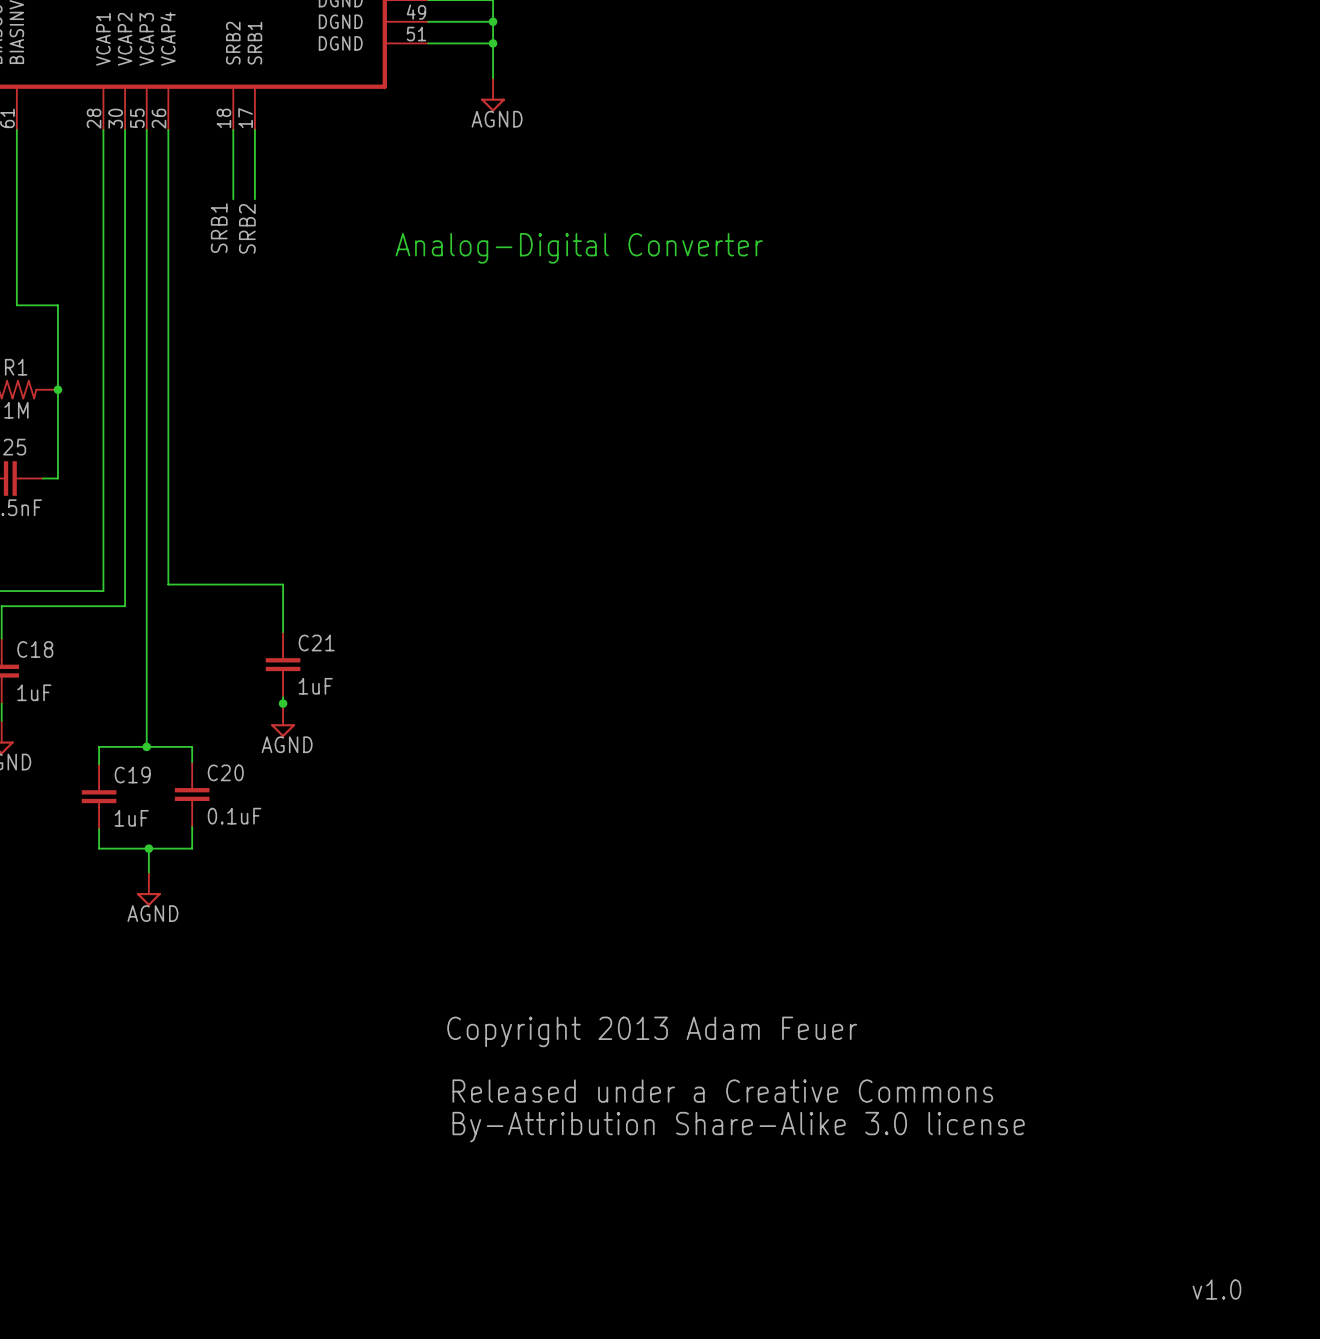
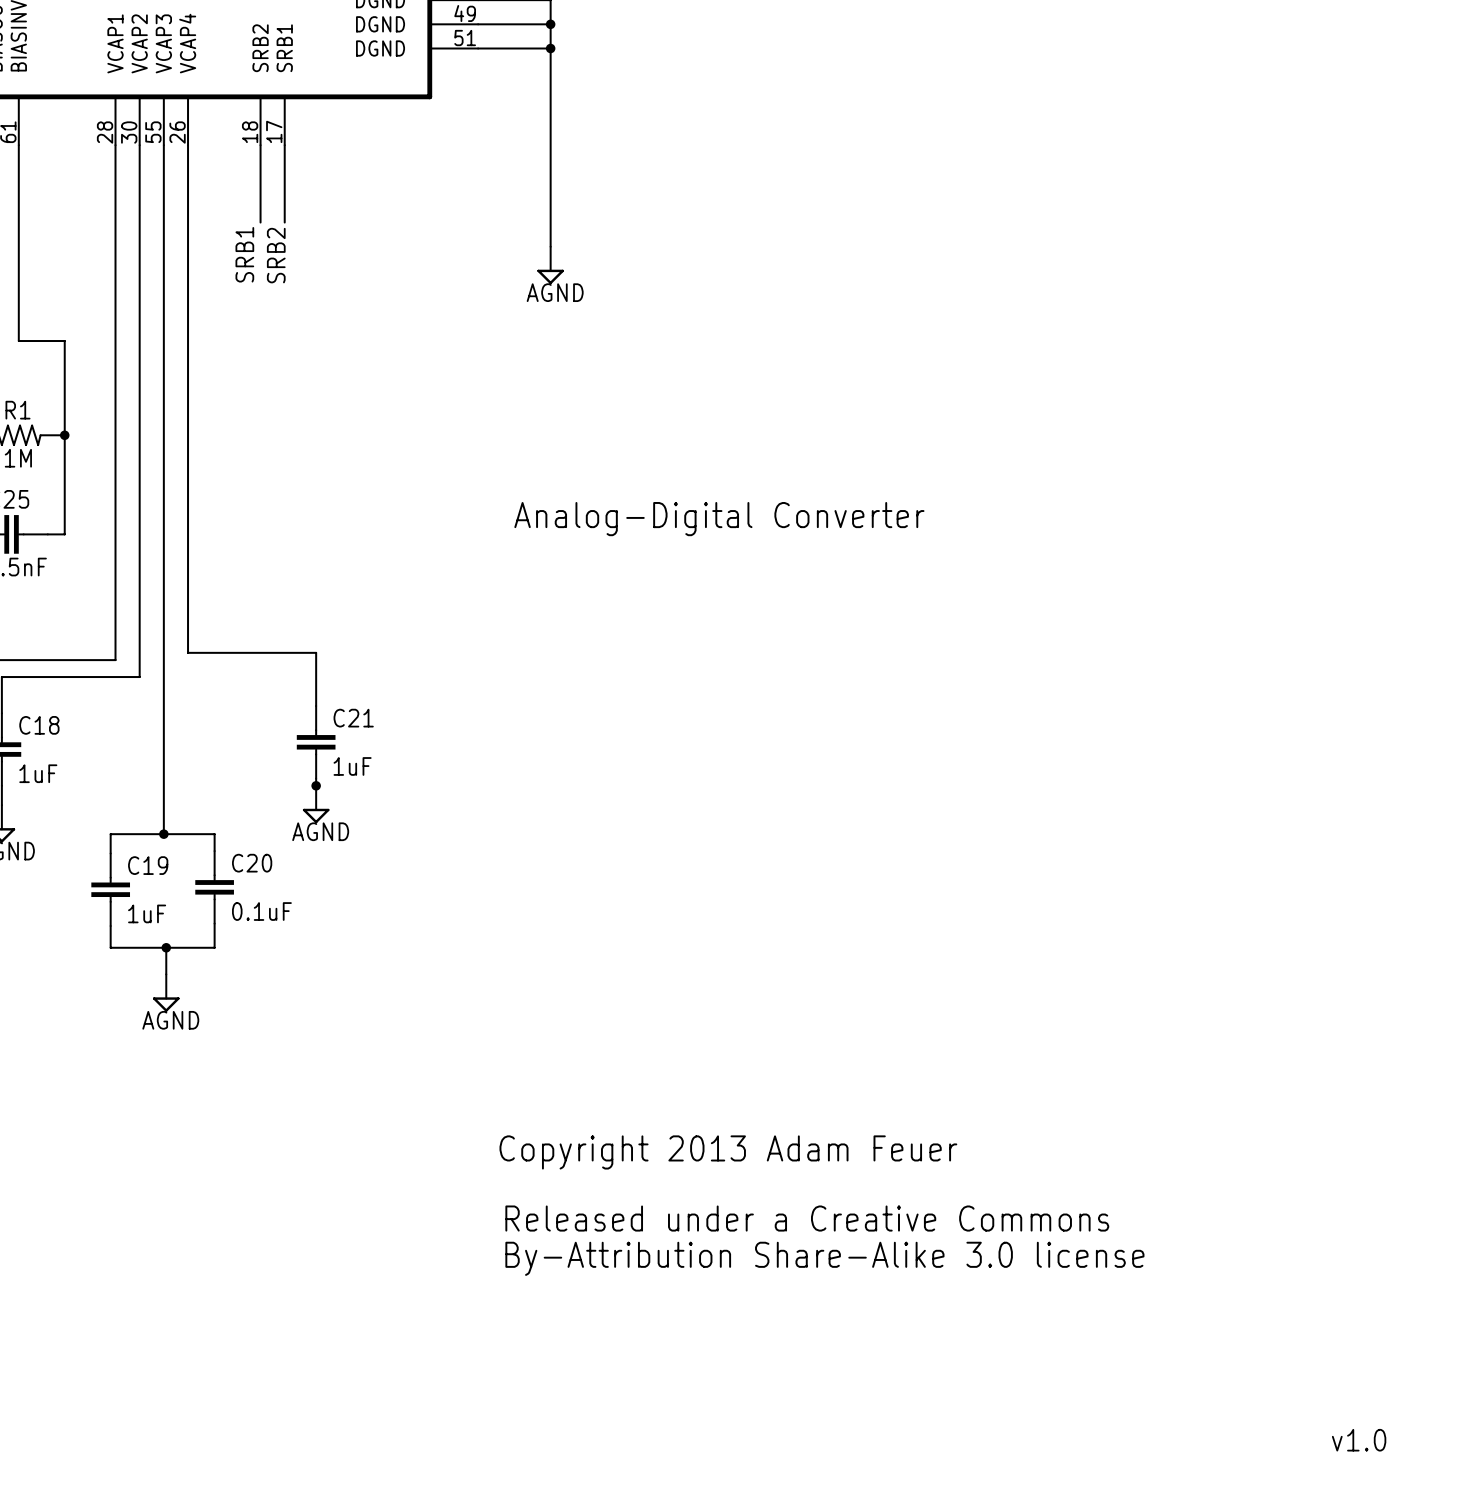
wire: none -> (550, 87) (550, 246)
power symbol position: AGND (493, 94) -> AGND (550, 265)
text: Analog-Digital Converter (579, 248) -> none
text: none -> Analog-Digital Converter (719, 519)

